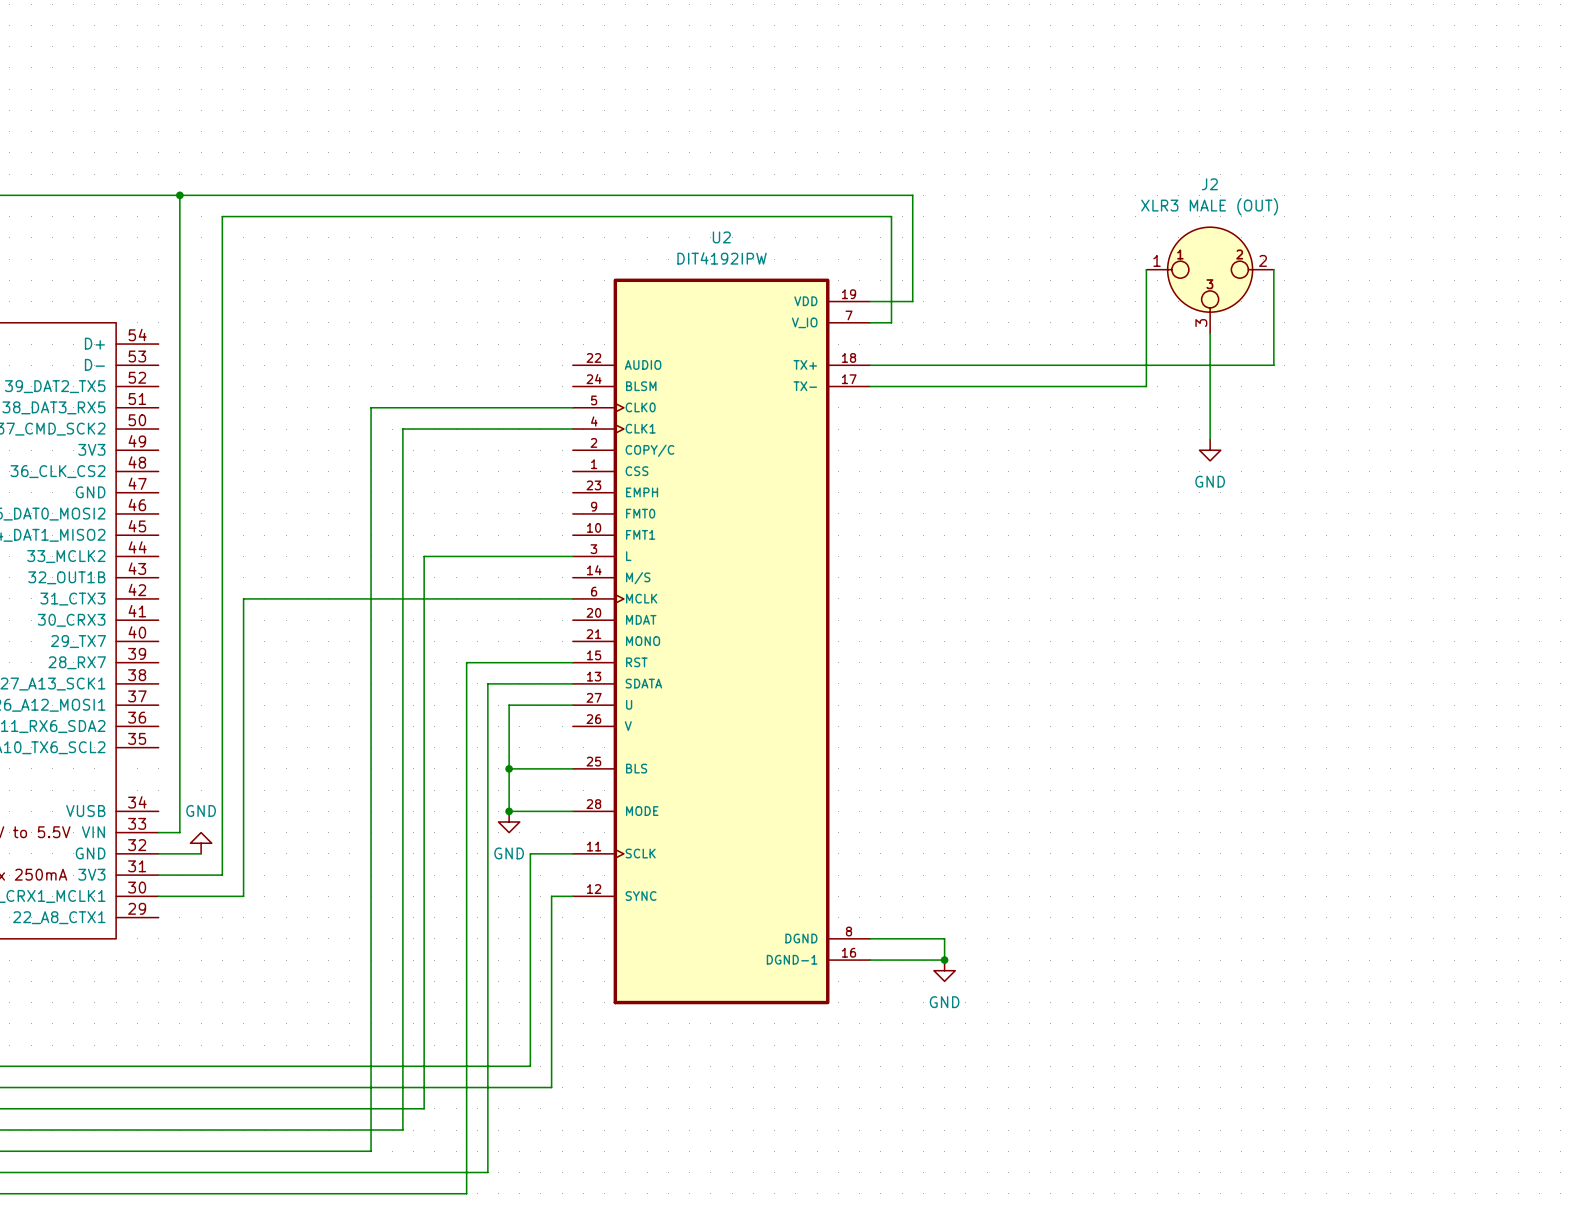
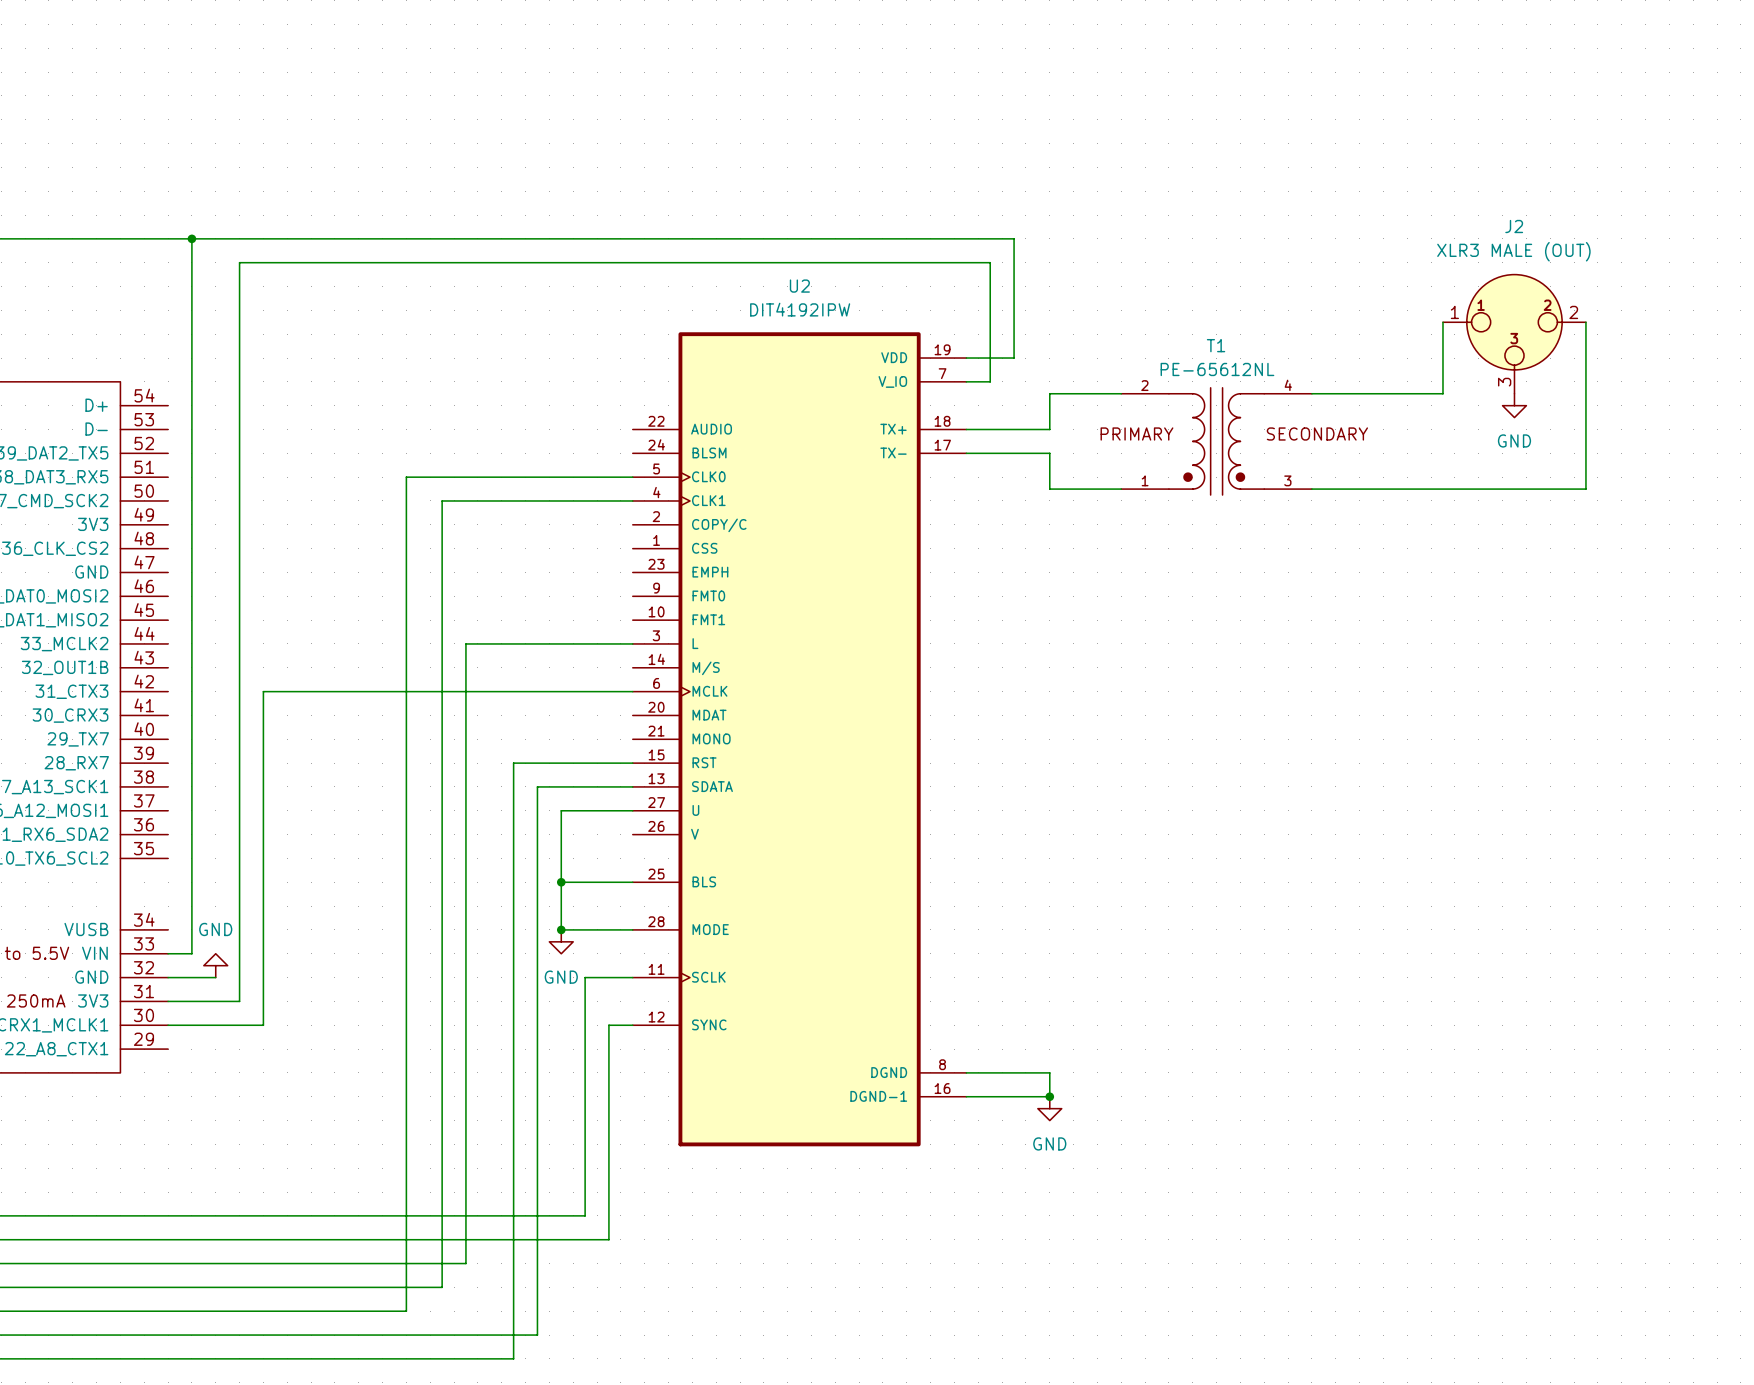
wire: (1146, 269) (1146, 386) (944, 386) -> (1121, 489) (1049, 489) (1049, 453)
wire: (1273, 269) (1273, 365) (944, 365) -> (1121, 393) (1049, 393) (1049, 429)
wire: none -> (1442, 322) (1442, 393) (1311, 393)
wire: none -> (1585, 322) (1585, 489) (1311, 489)
J2 position: (1210, 280) -> (1514, 334)
wire: (1210, 333) (1210, 439) -> none
T1: none -> PE-65612NL (1216, 441)
power symbol position: GND (1210, 450) -> GND (1514, 405)

